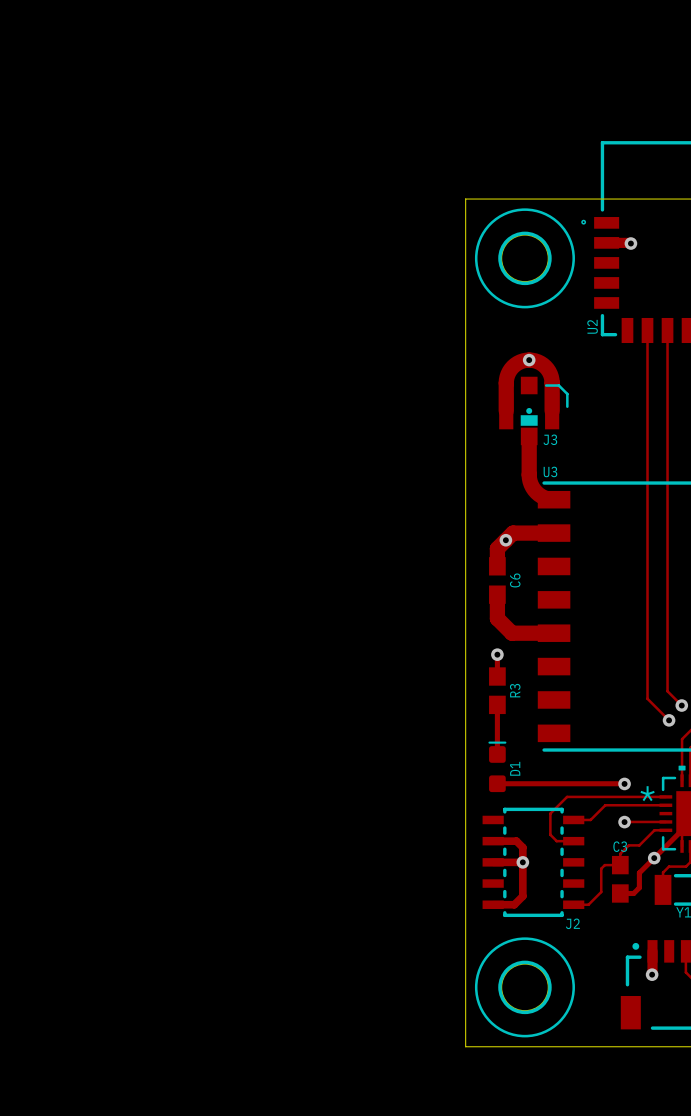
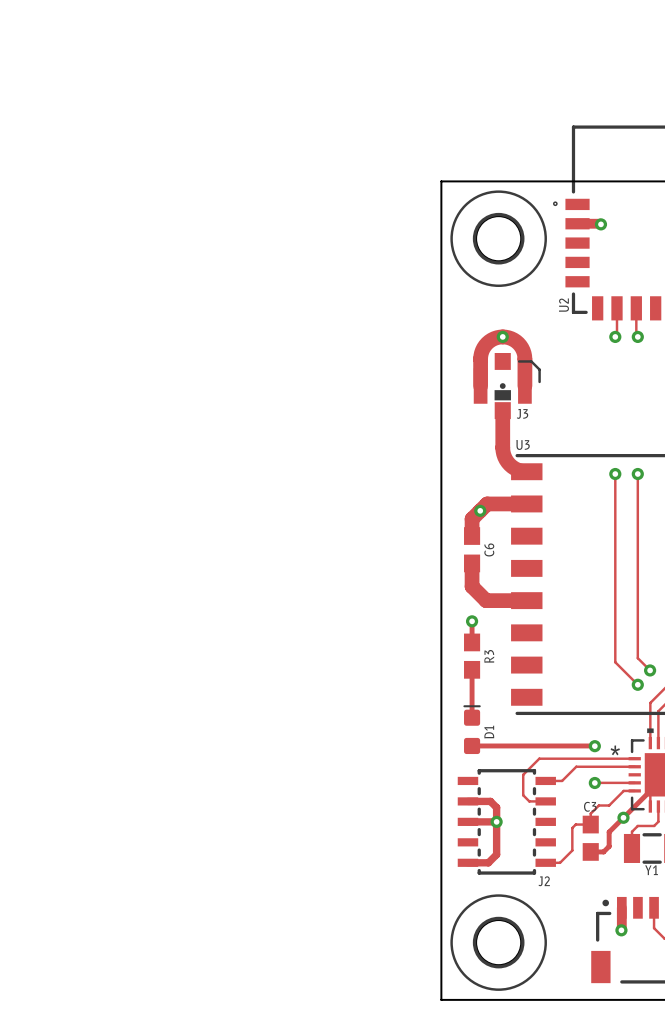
track: (647, 358) (647, 698) -> (615, 474) (615, 662) (616, 663)
track: (667, 358) (667, 691) (669, 692) -> (637, 474) (637, 658)
via: none -> (615, 336)
via: none -> (637, 336)
via: none -> (615, 474)
via: none -> (637, 474)

